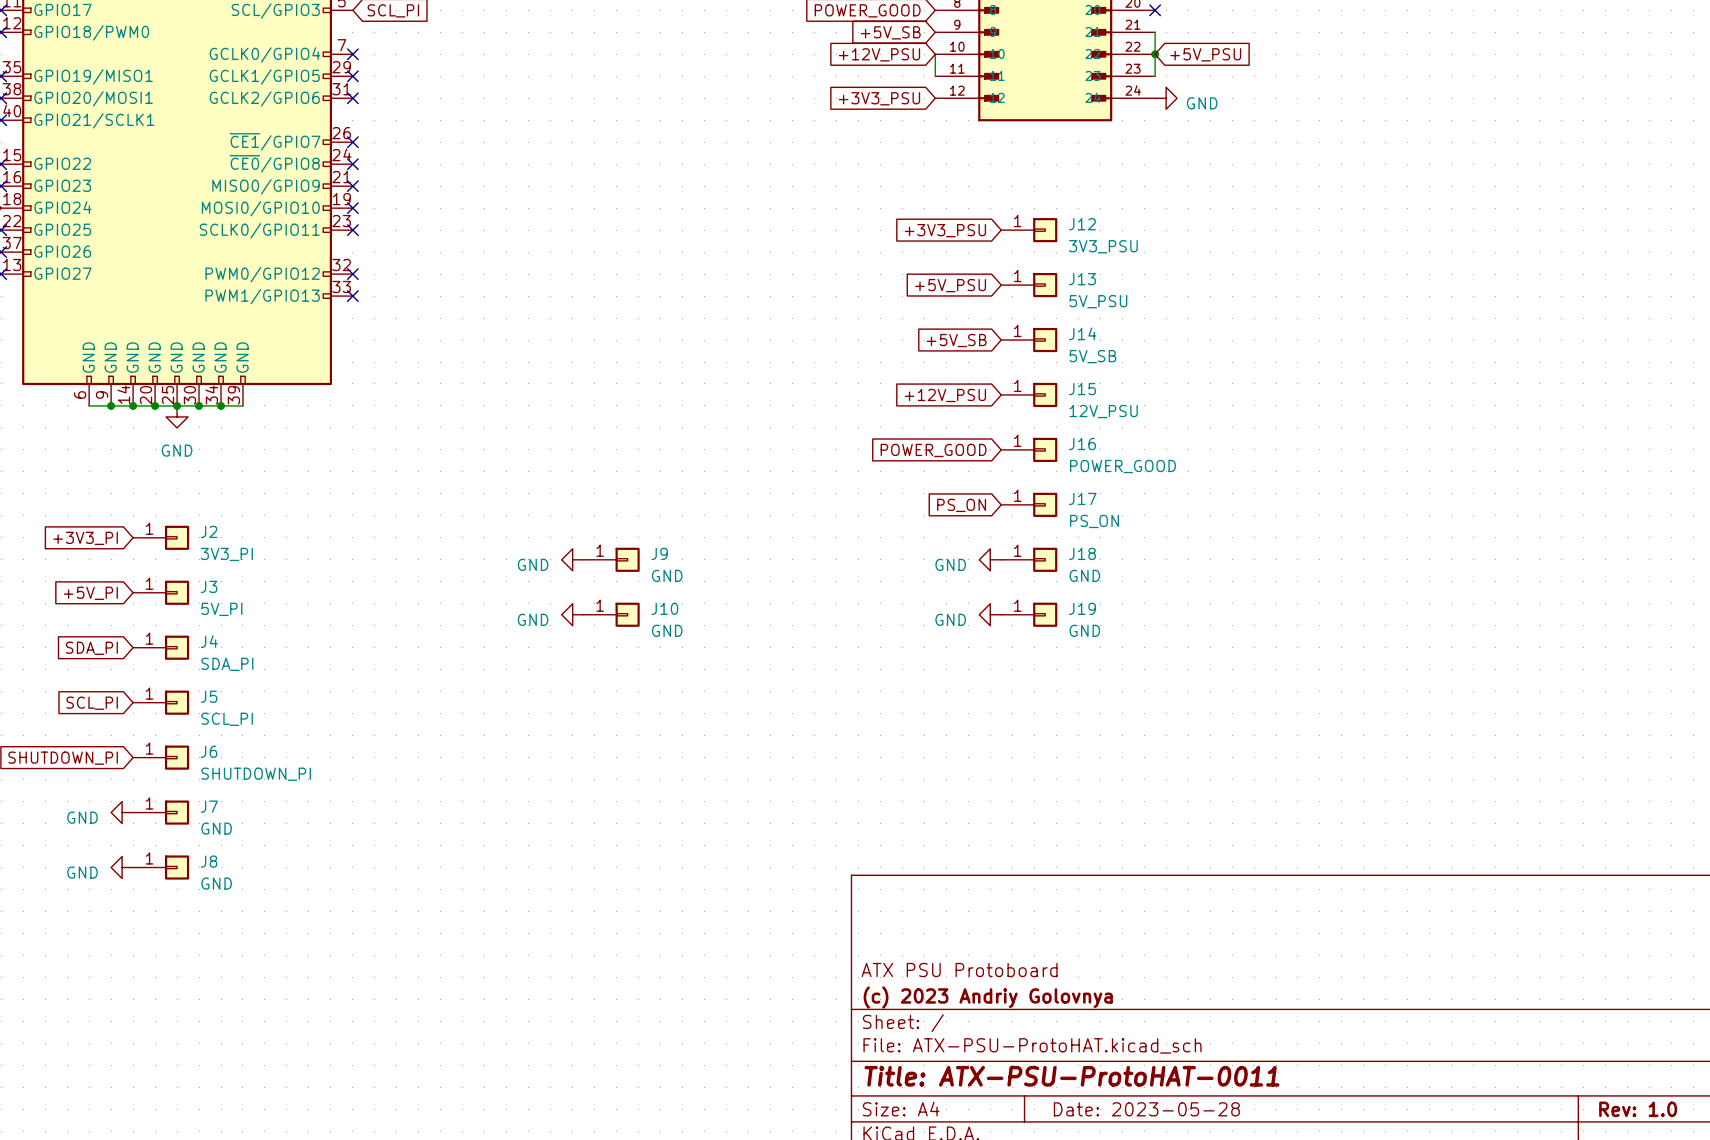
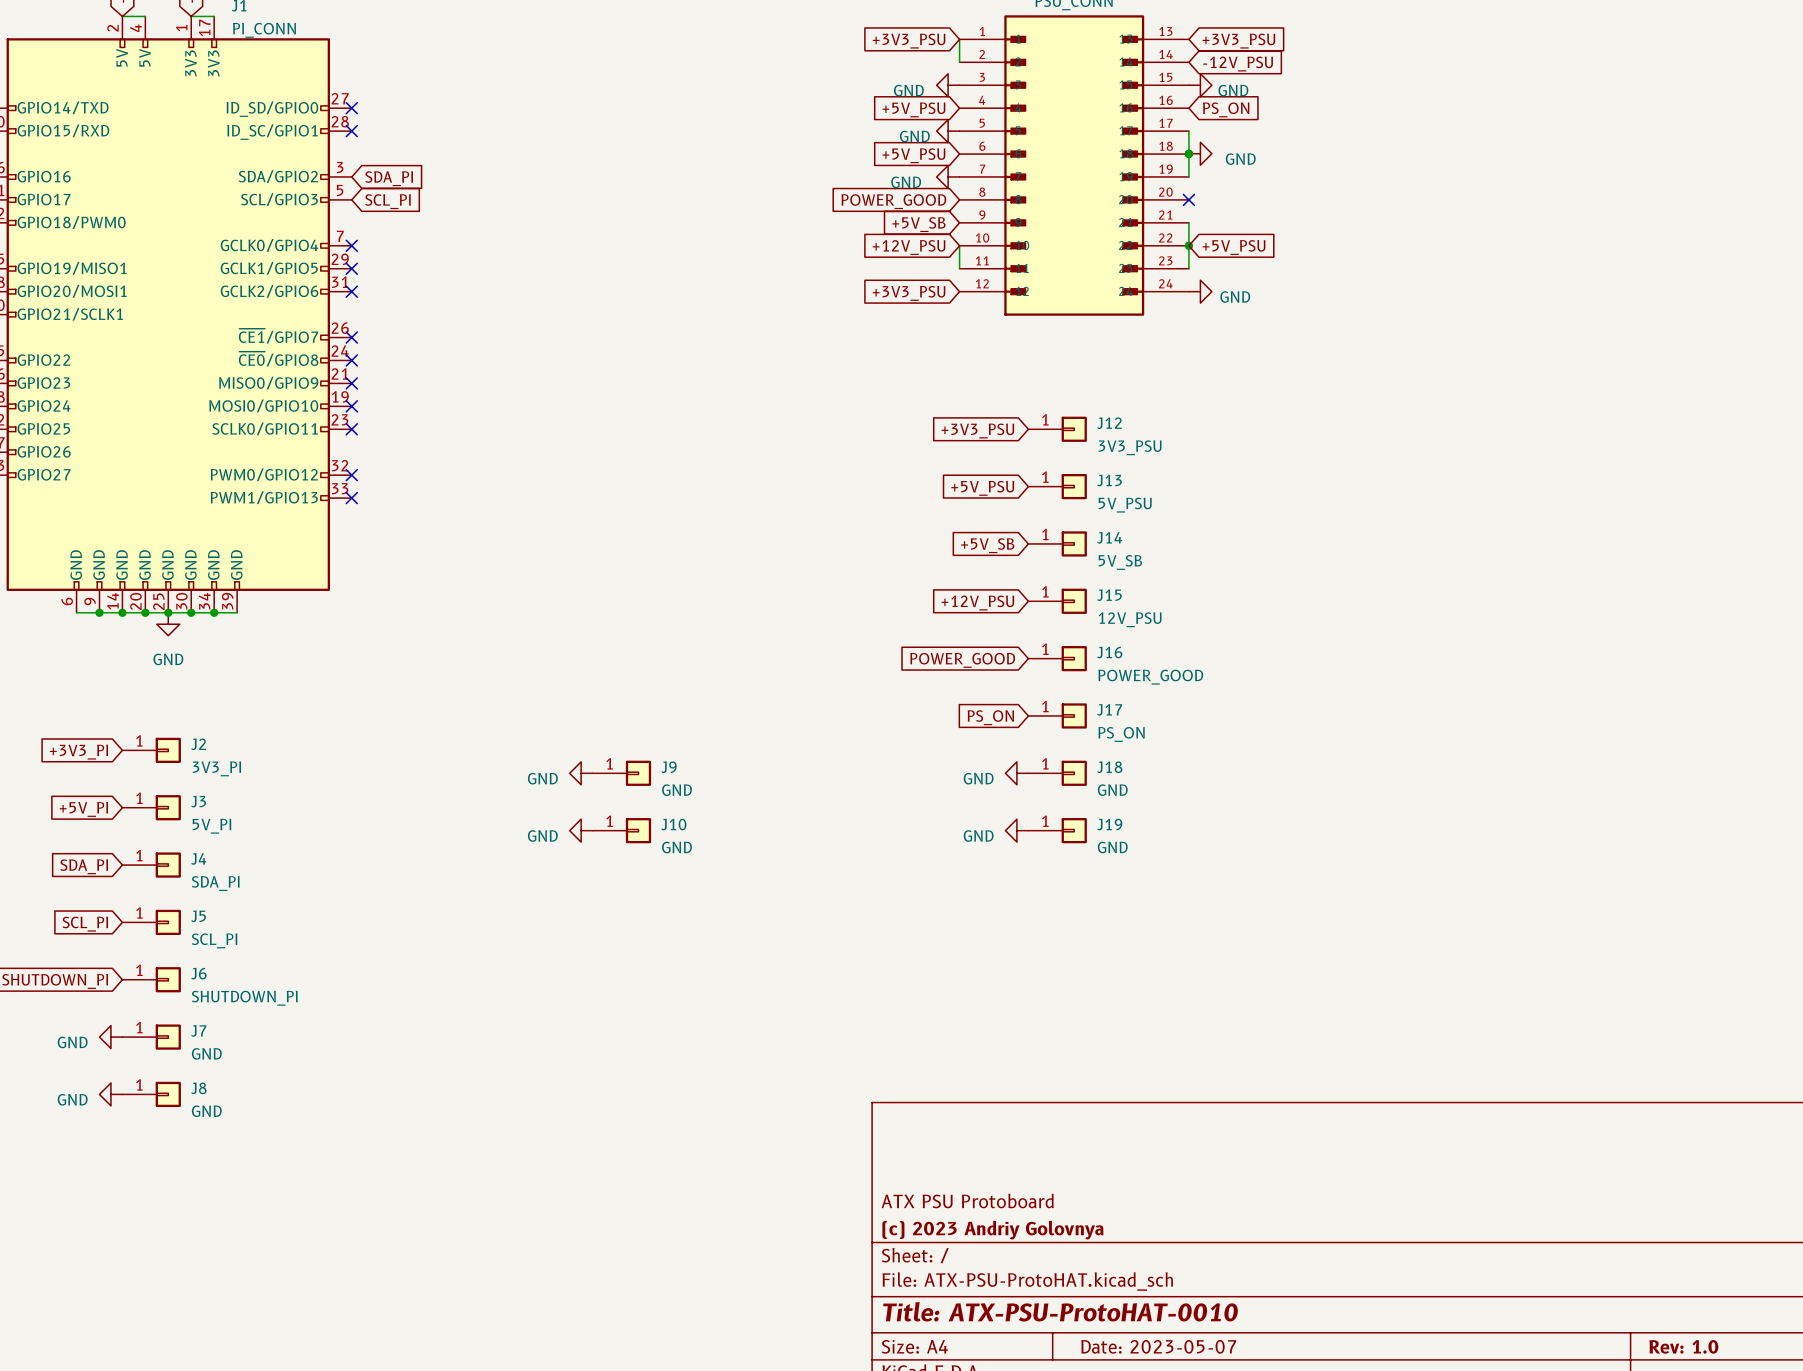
title block: Title: ATX-PSU-ProtoHAT-0011 (1071, 1076) -> Title: ATX-PSU-ProtoHAT-0010 (1060, 1311)
title block: Date: 2023-05-28 (1146, 1109) -> Date: 2023-05-07 (1158, 1346)

